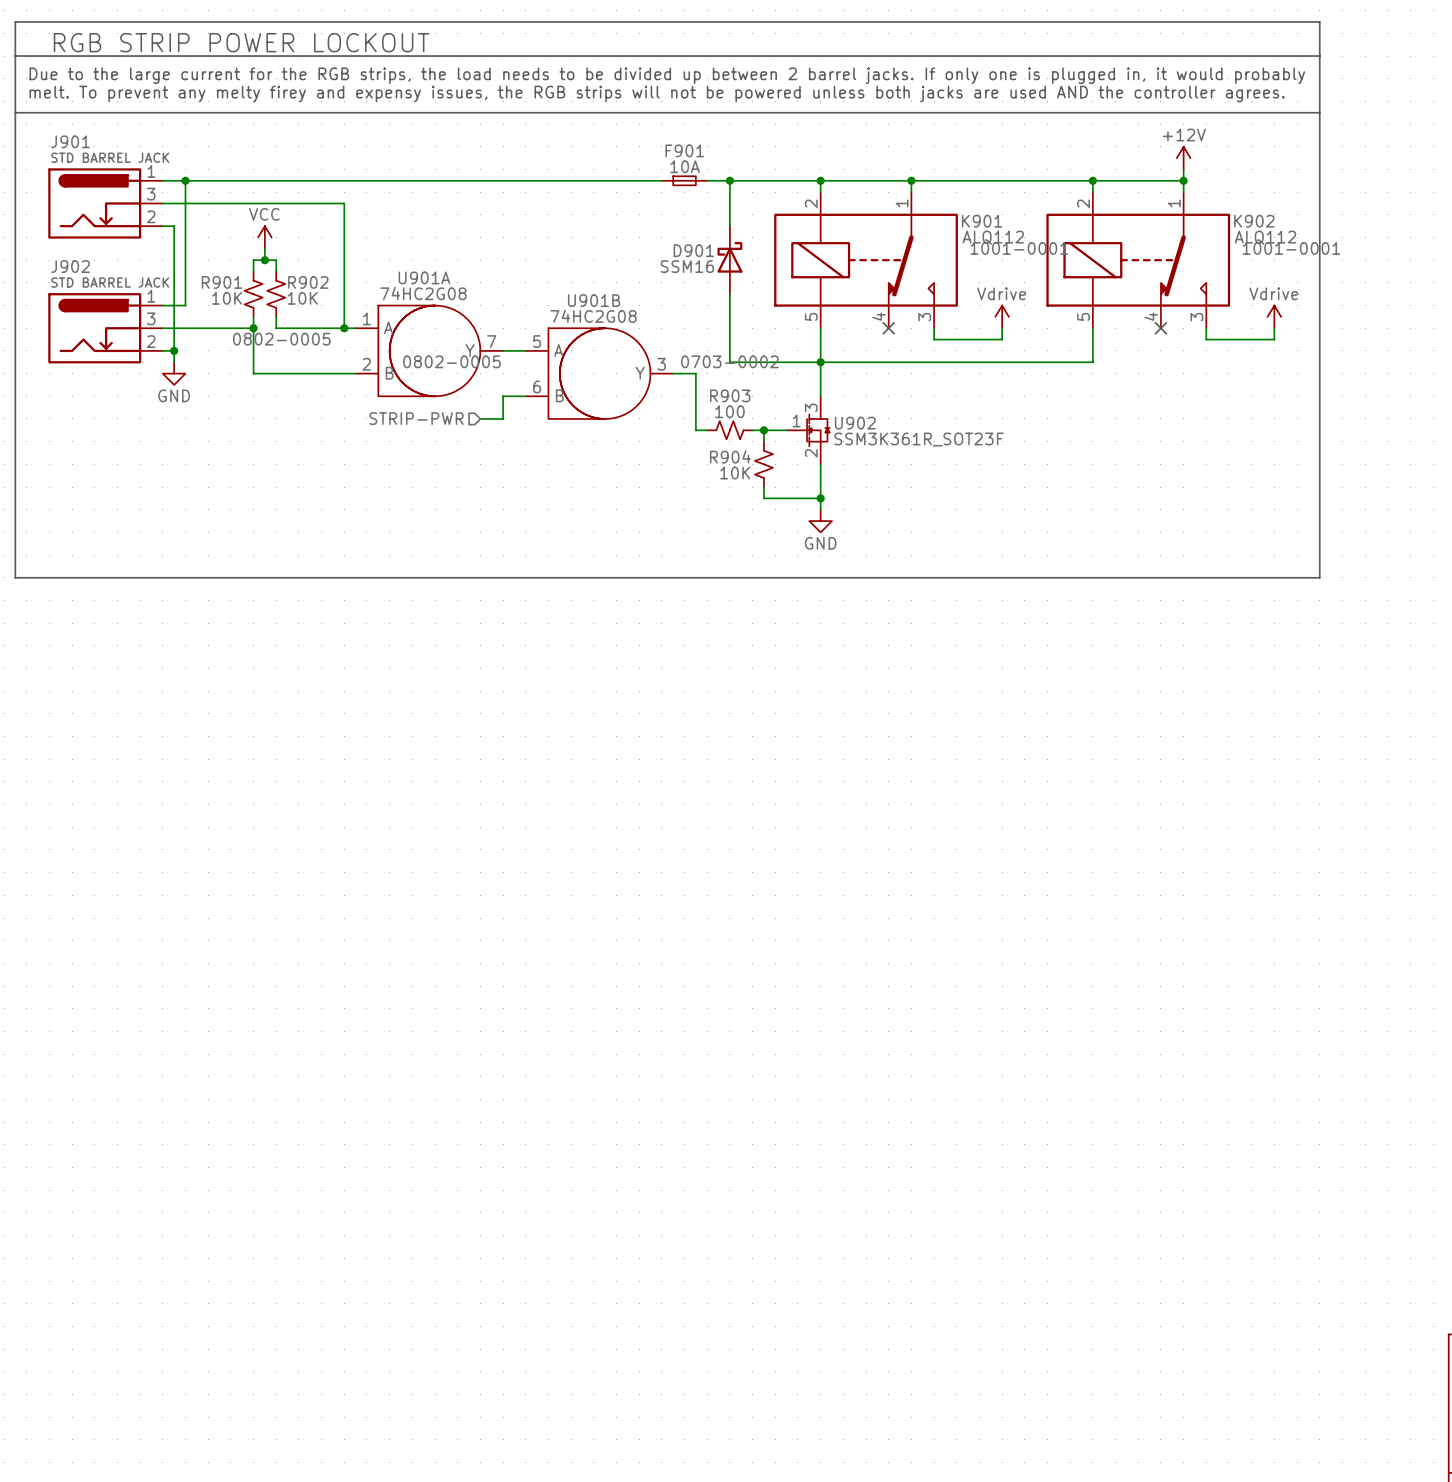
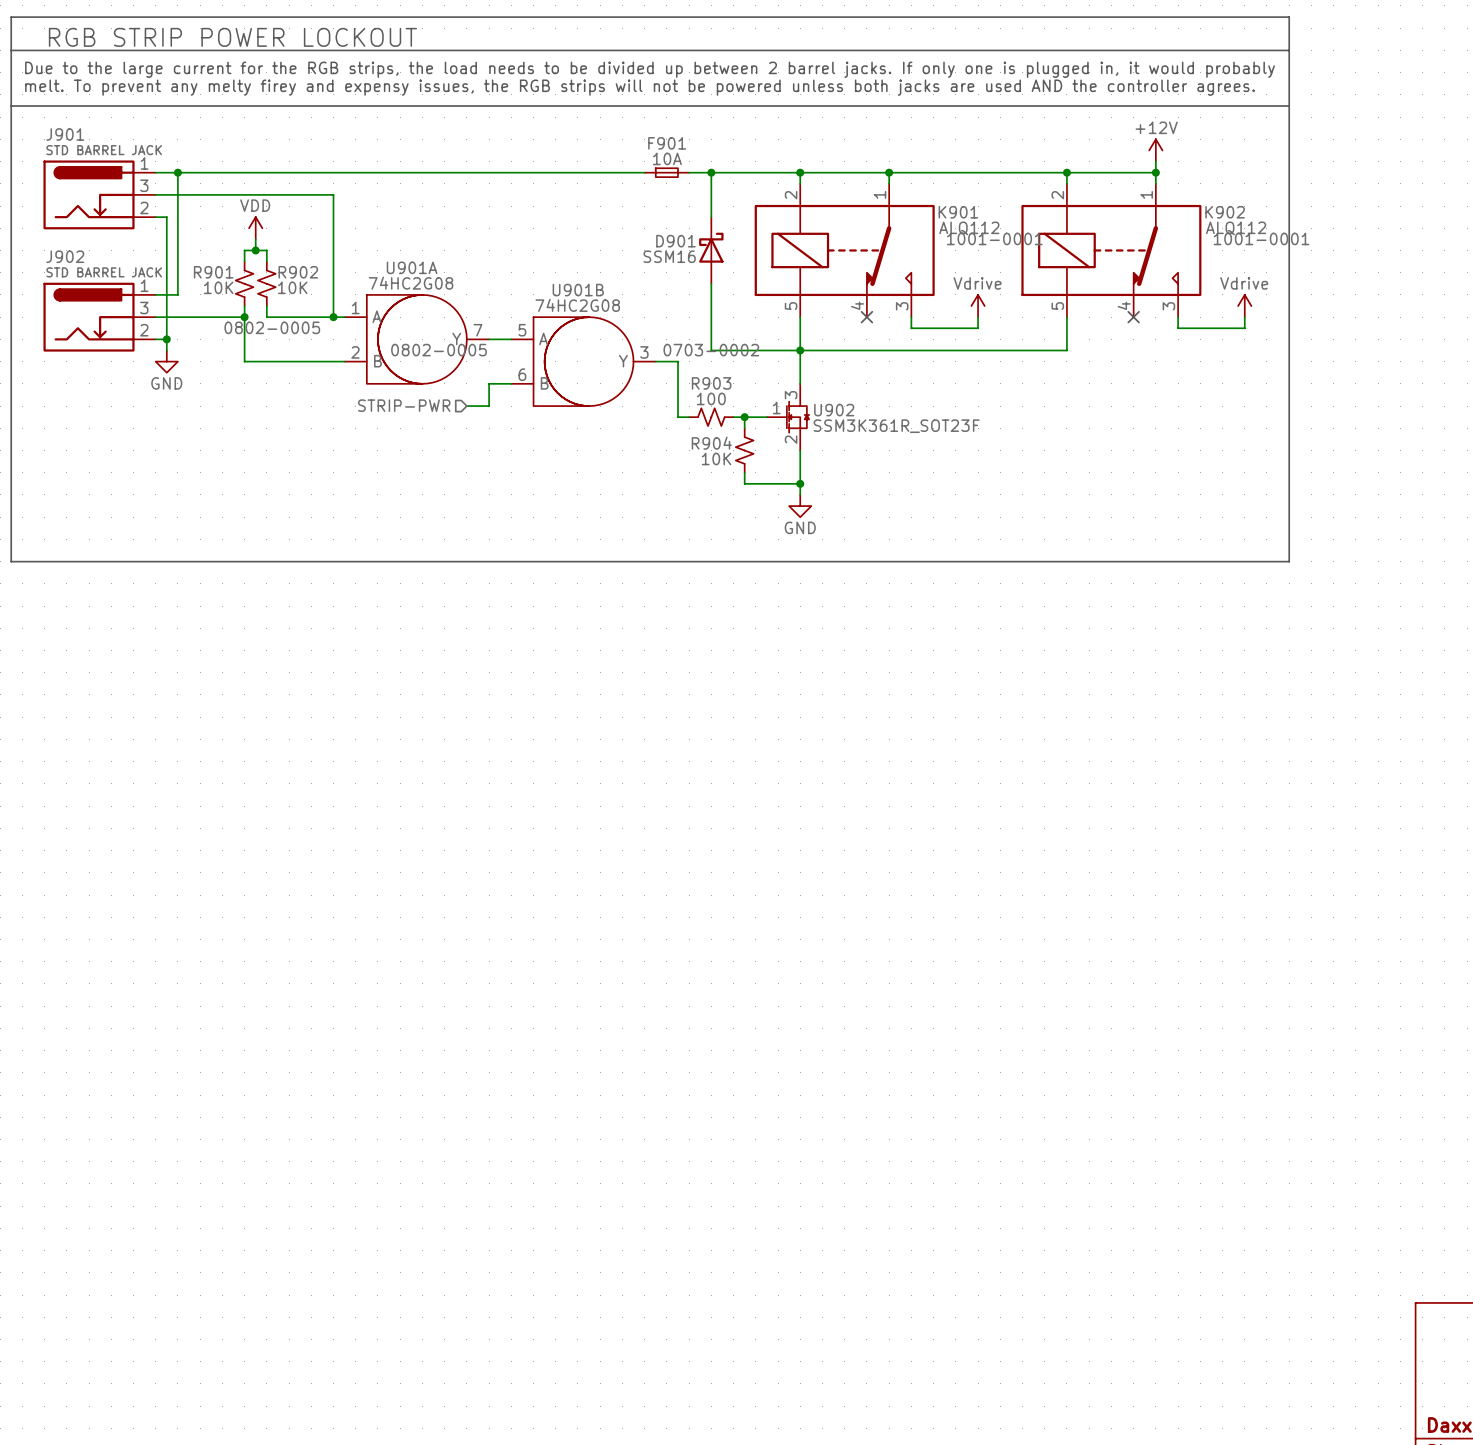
power symbol: VCC (264, 237) -> VDD (255, 228)

